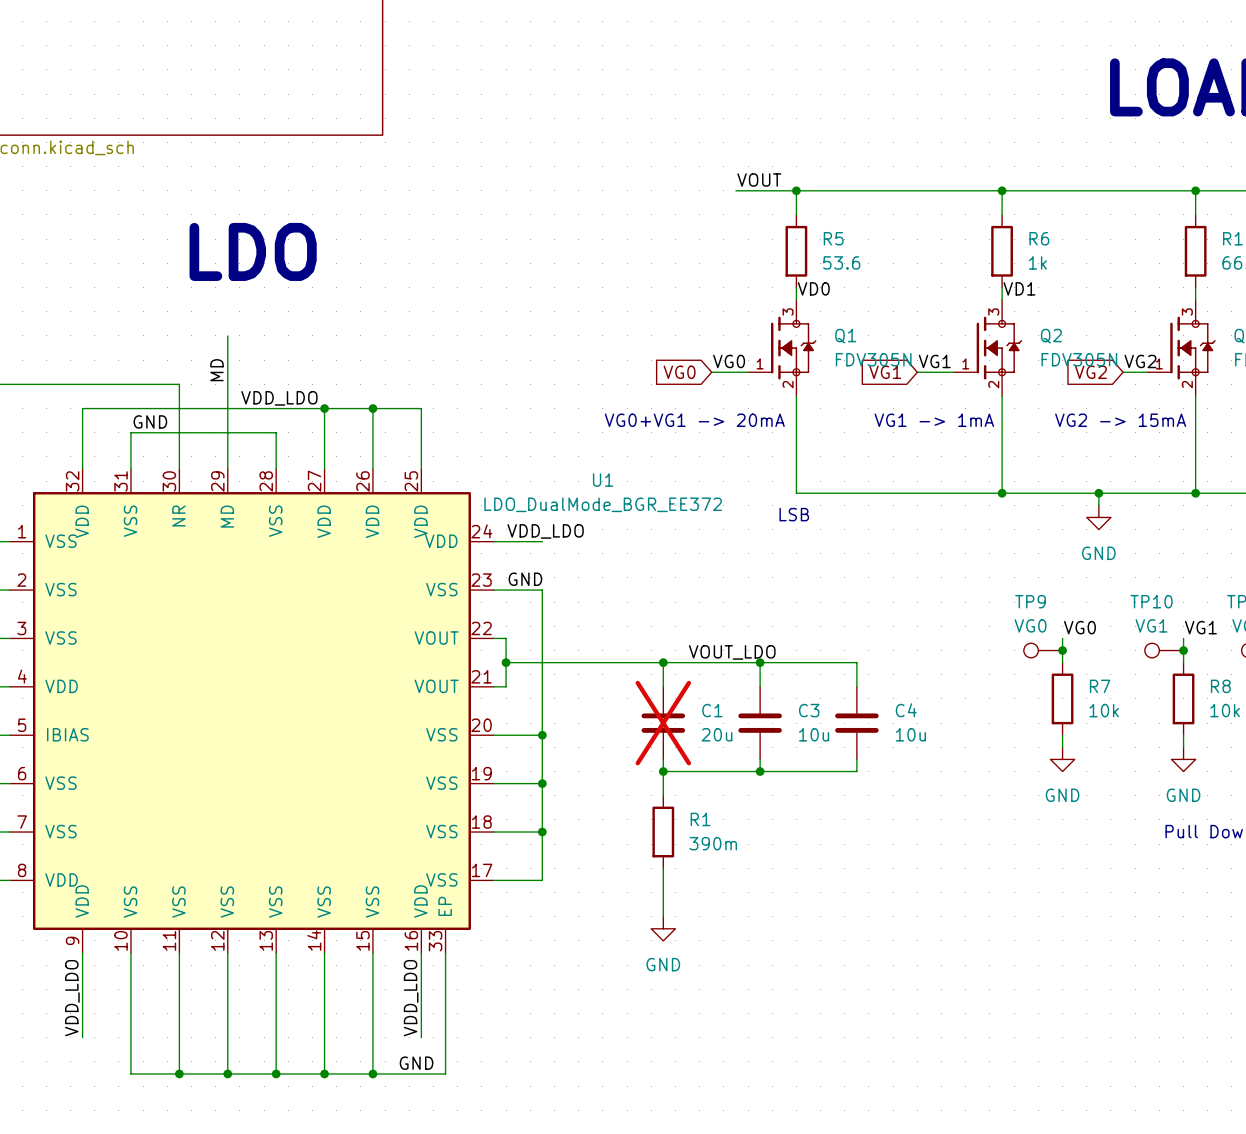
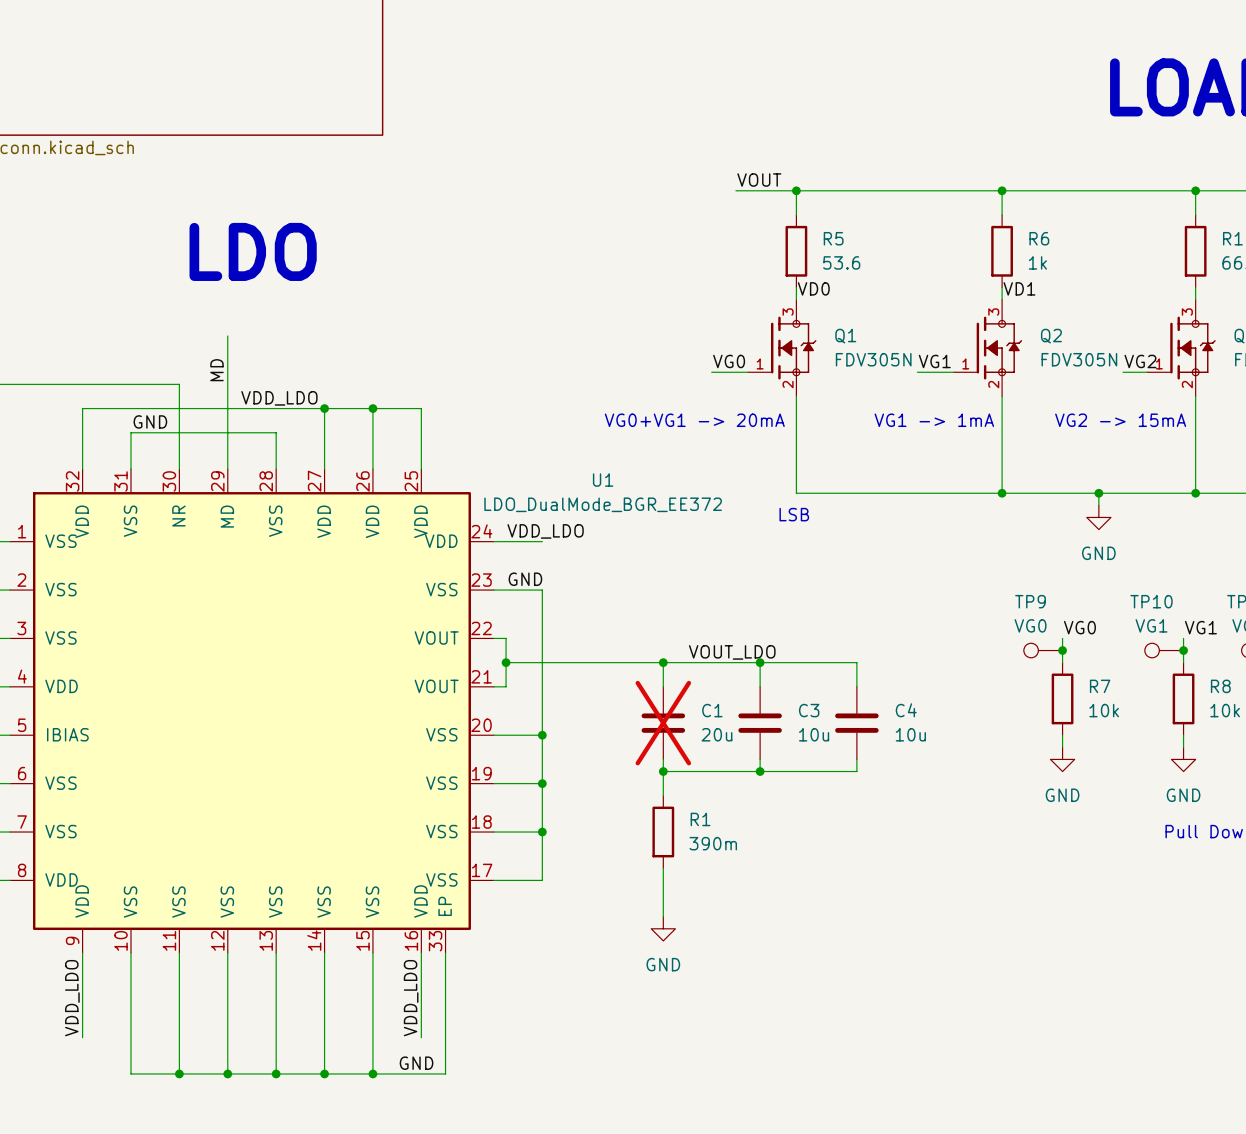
global label: VG0 (679, 372) -> none
global label: VG1 (885, 372) -> none
global label: VG2 (1090, 372) -> none

